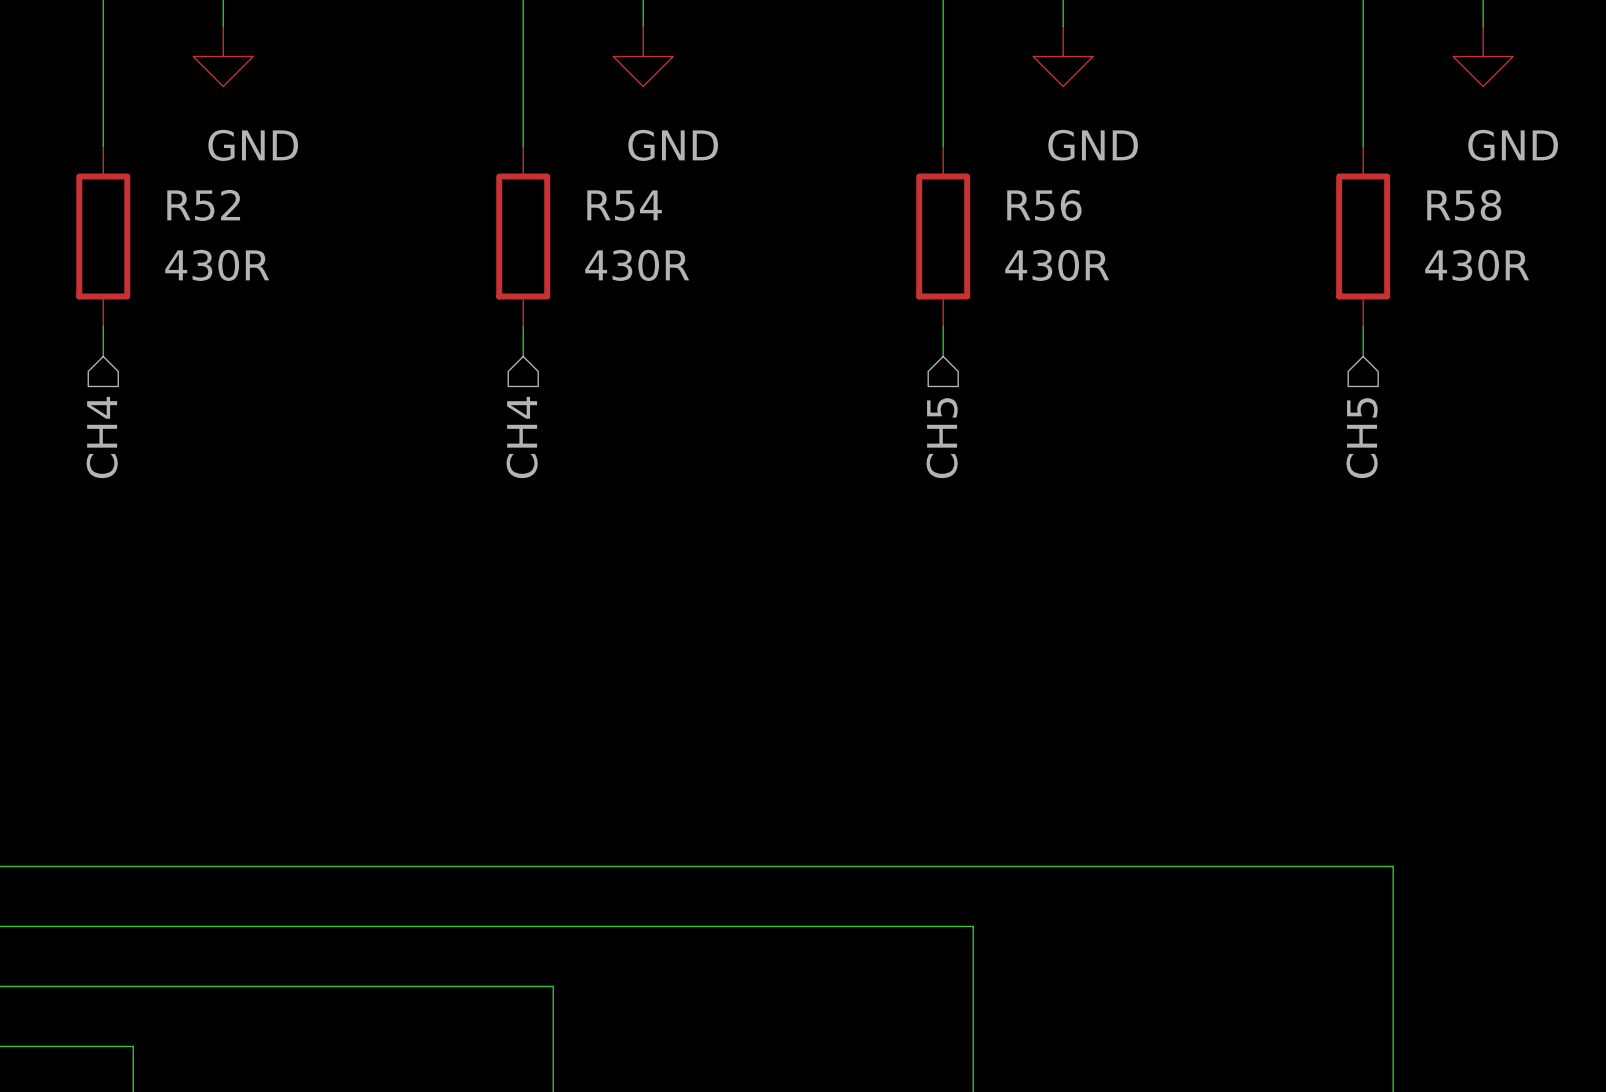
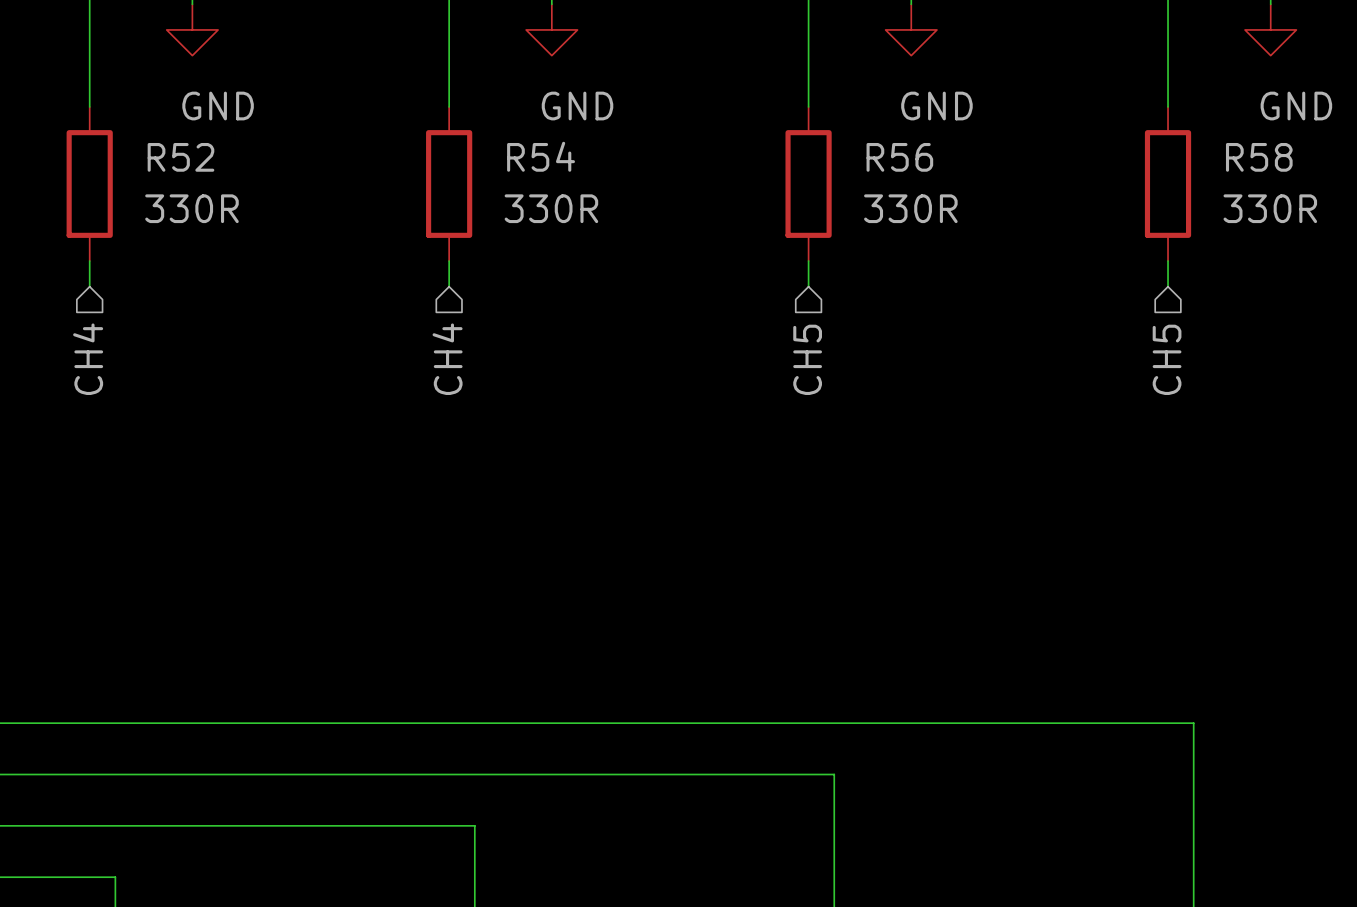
R52 value: 430R (217, 265) -> 330R (191, 208)
R54 value: 430R (637, 265) -> 330R (551, 208)
R56 value: 430R (1057, 265) -> 330R (910, 208)
R58 value: 430R (1477, 265) -> 330R (1270, 208)

